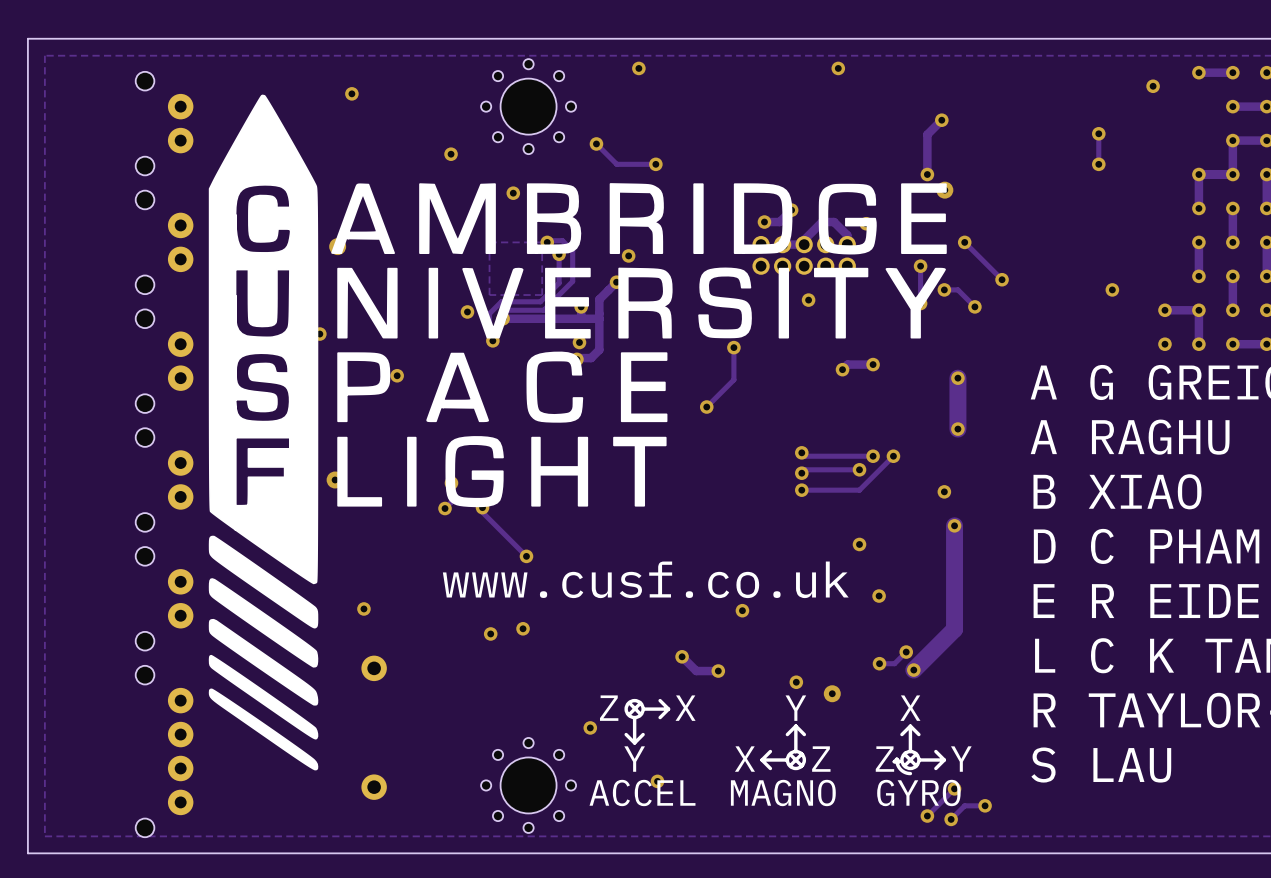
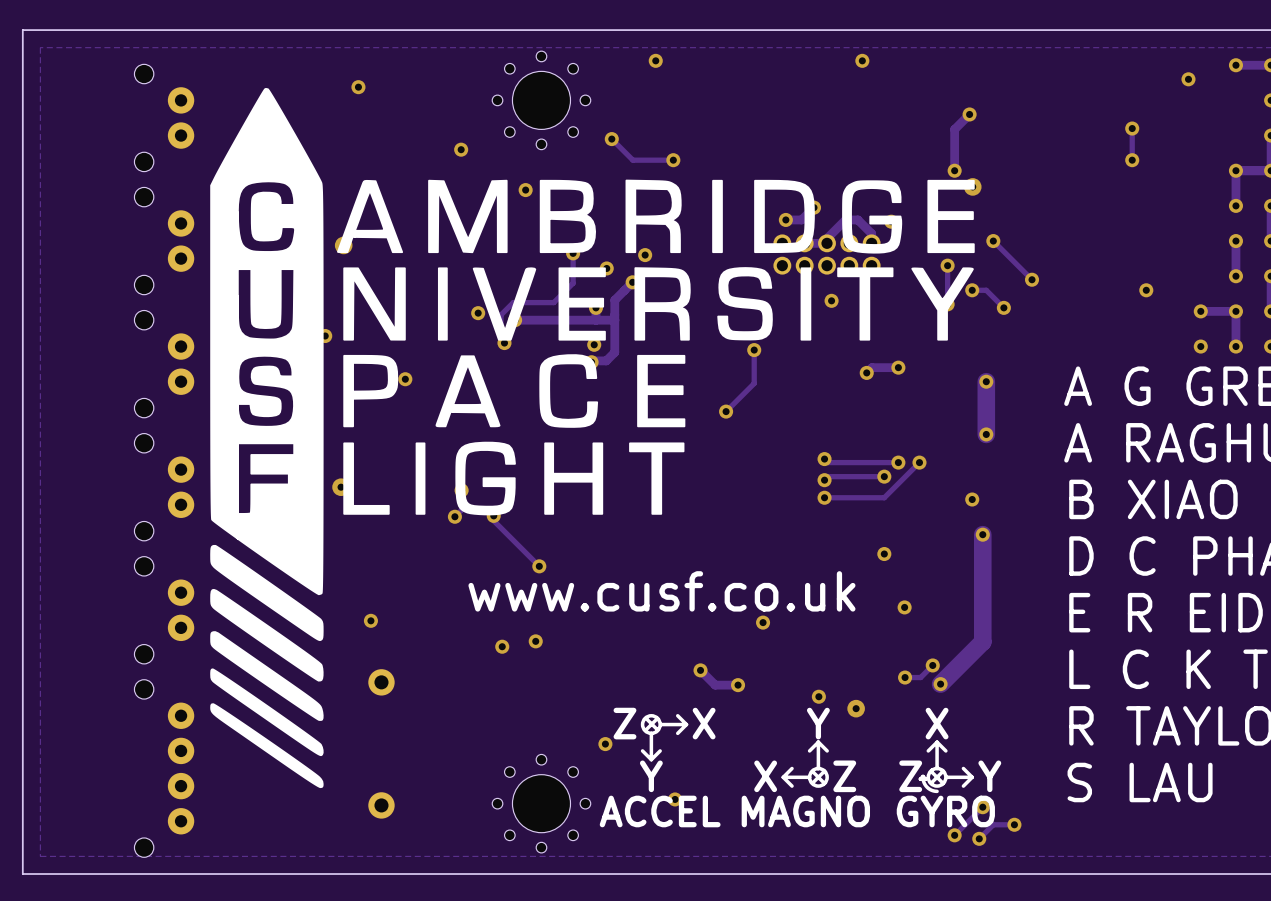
zone outline: (542, 242) (489, 242) (489, 295) (542, 295) (542, 242) -> none
track: (547, 242) (562, 240) (572, 250) (572, 281) (543, 310) (503, 310) (503, 318) -> none
via position: (547, 242) -> (606, 268)

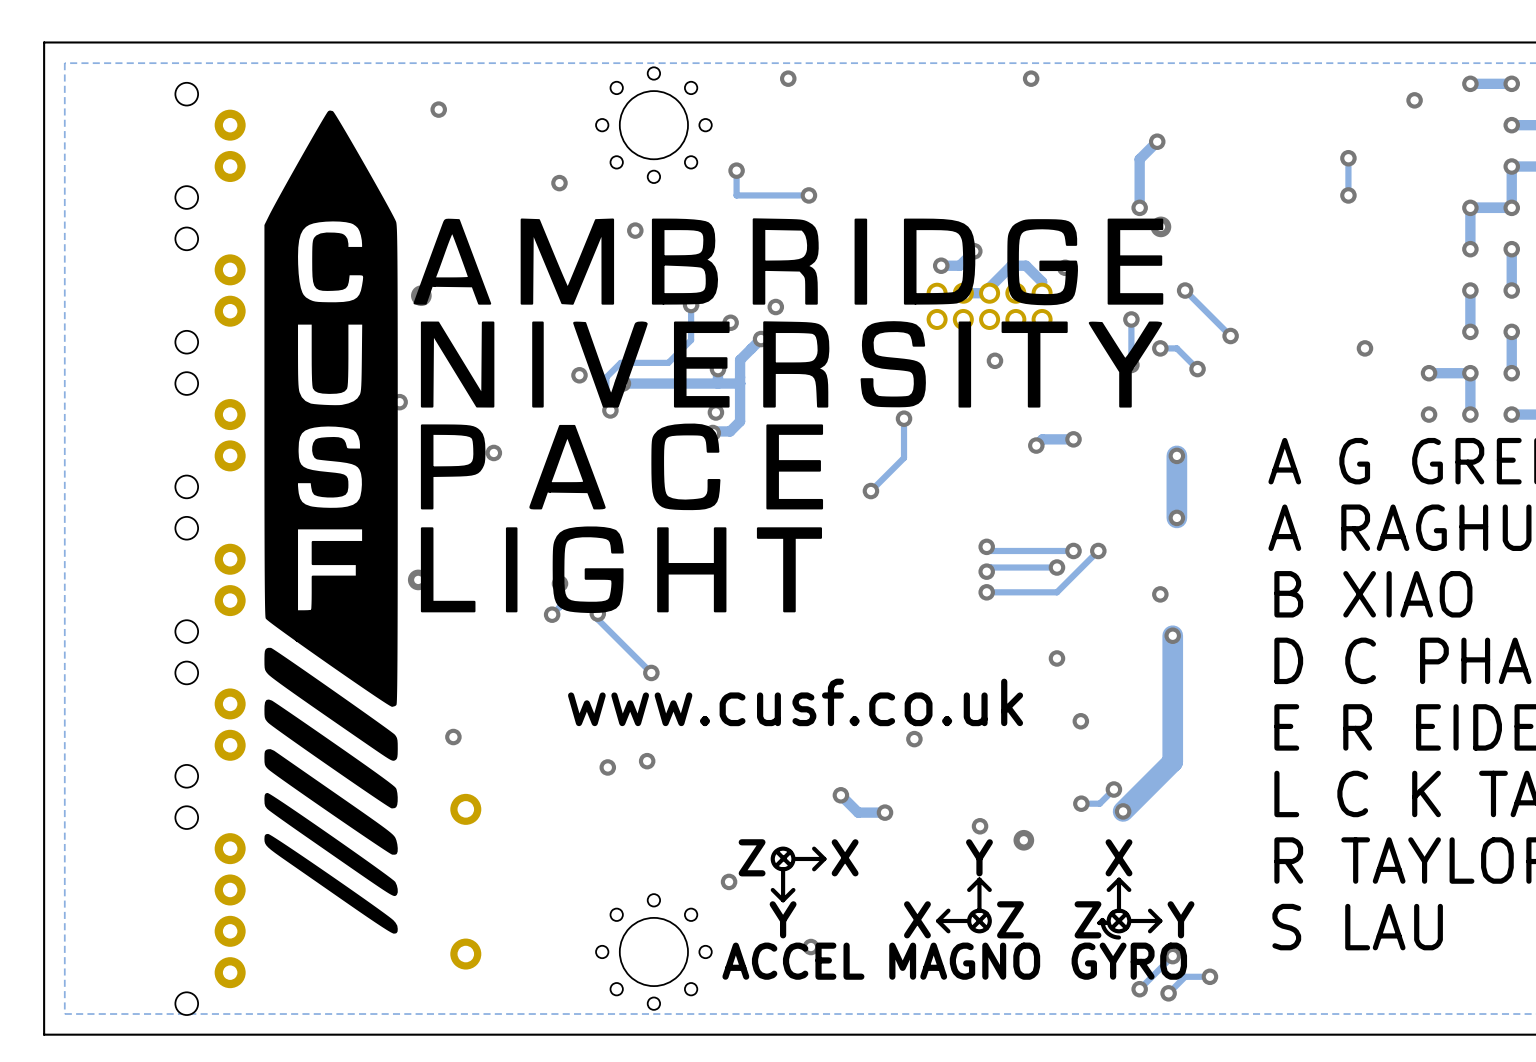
track: (611, 139) (632, 160) -> (736, 170) (736, 195) (761, 195)

